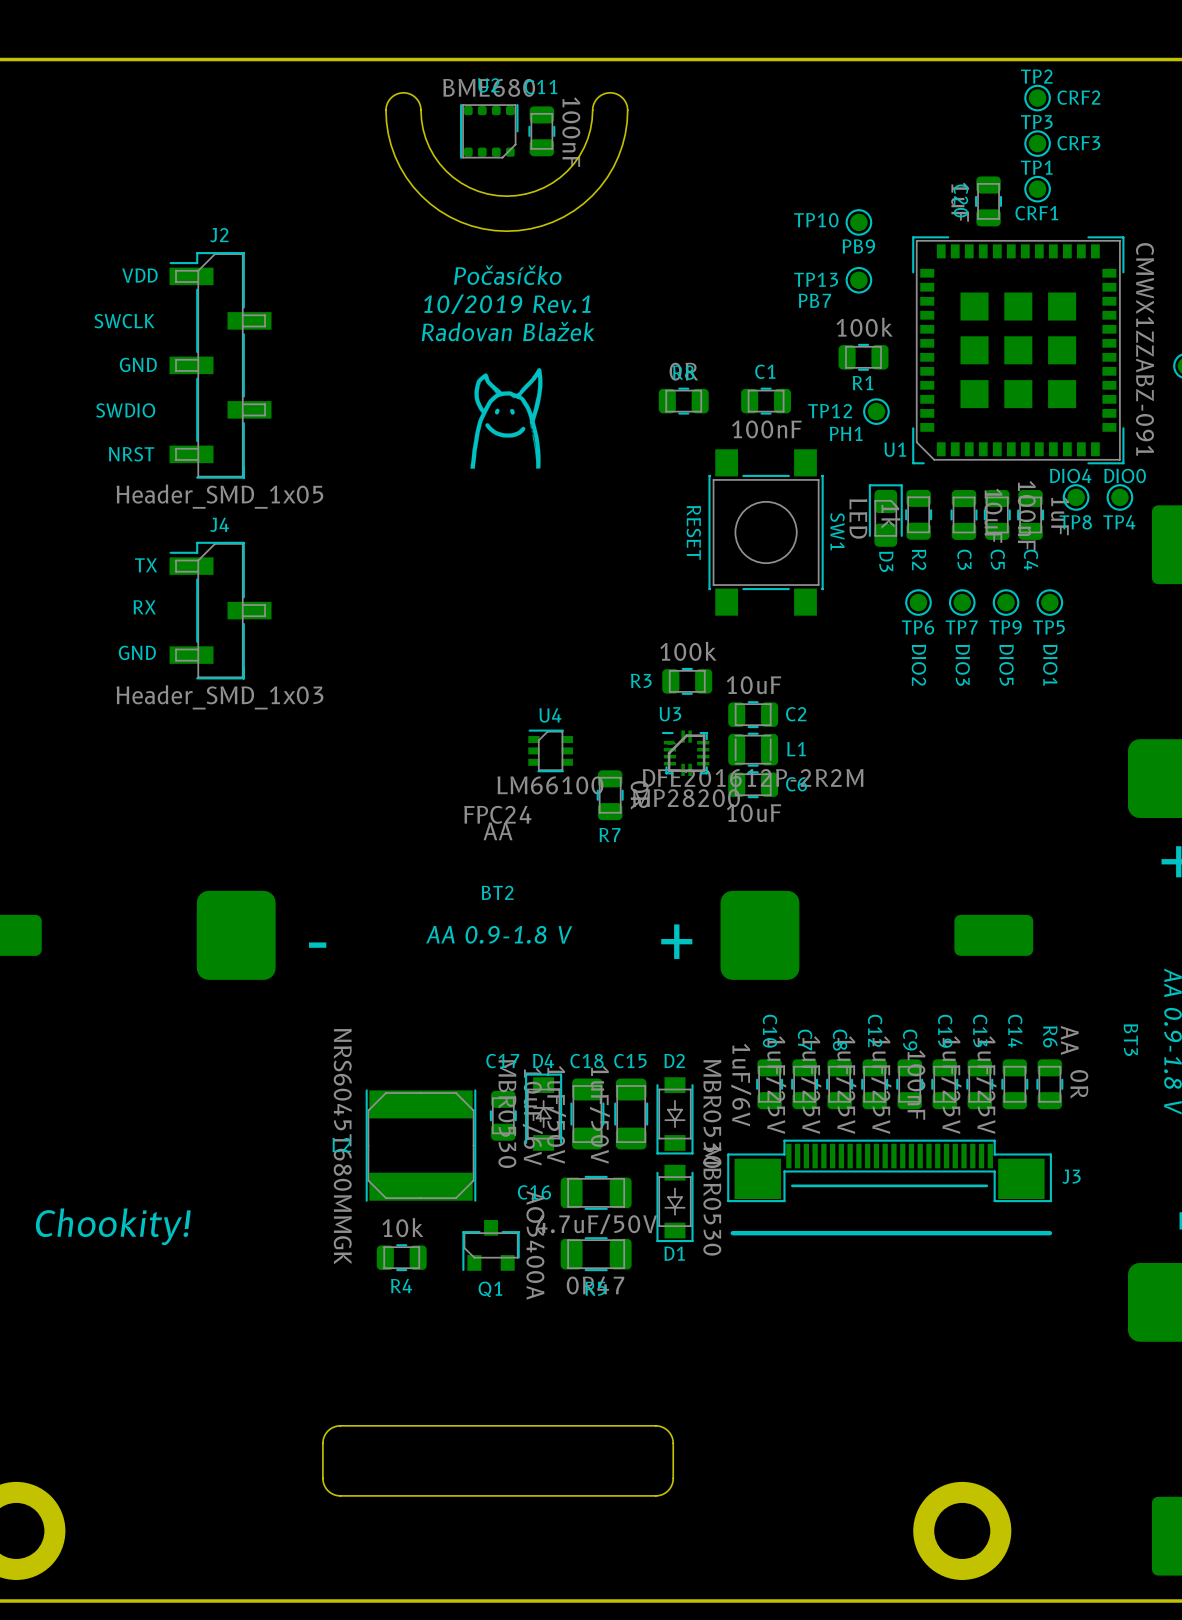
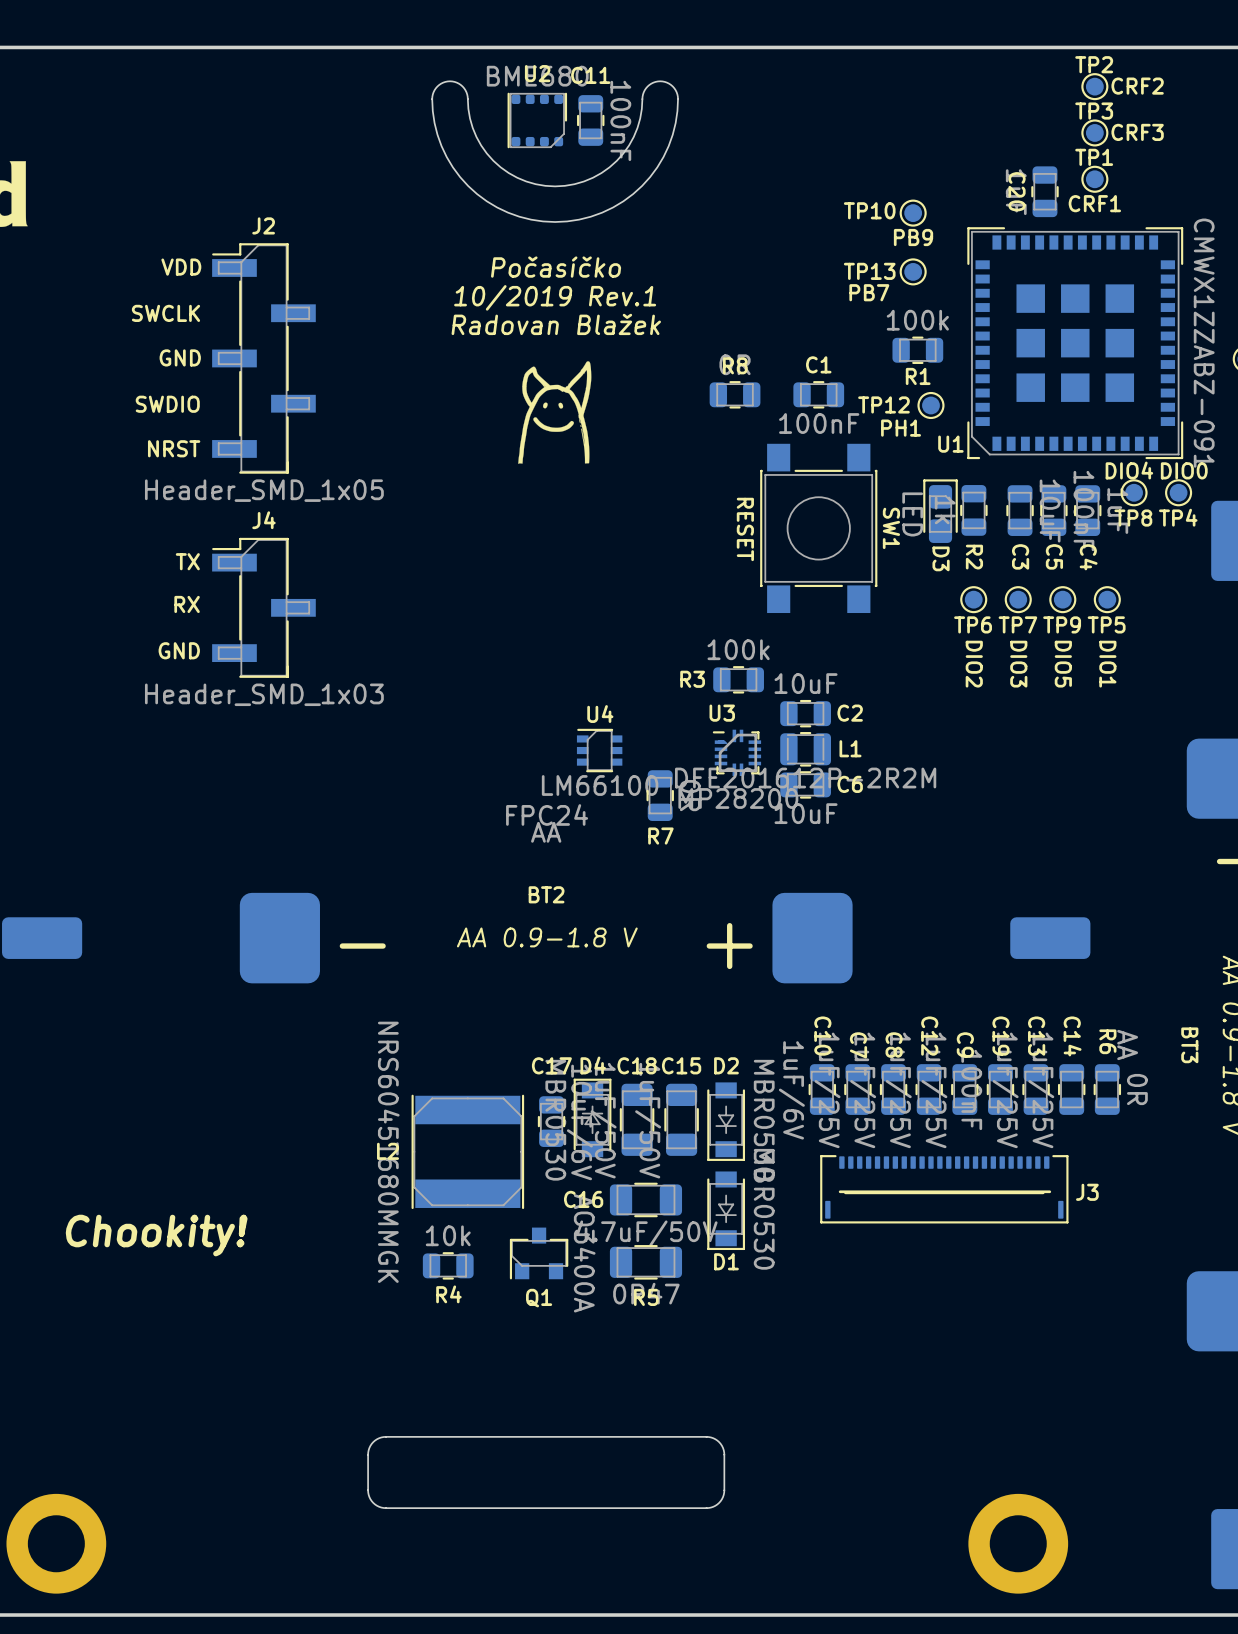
J3 footprint: [727, 1139, 1052, 1203] -> [820, 1155, 1069, 1224]
J3 name position: J3 (1071, 1176) -> J3 (1087, 1192)
line: none -> (1049, 1191) (840, 1191)
line: (1049, 1233) (732, 1233) -> none

